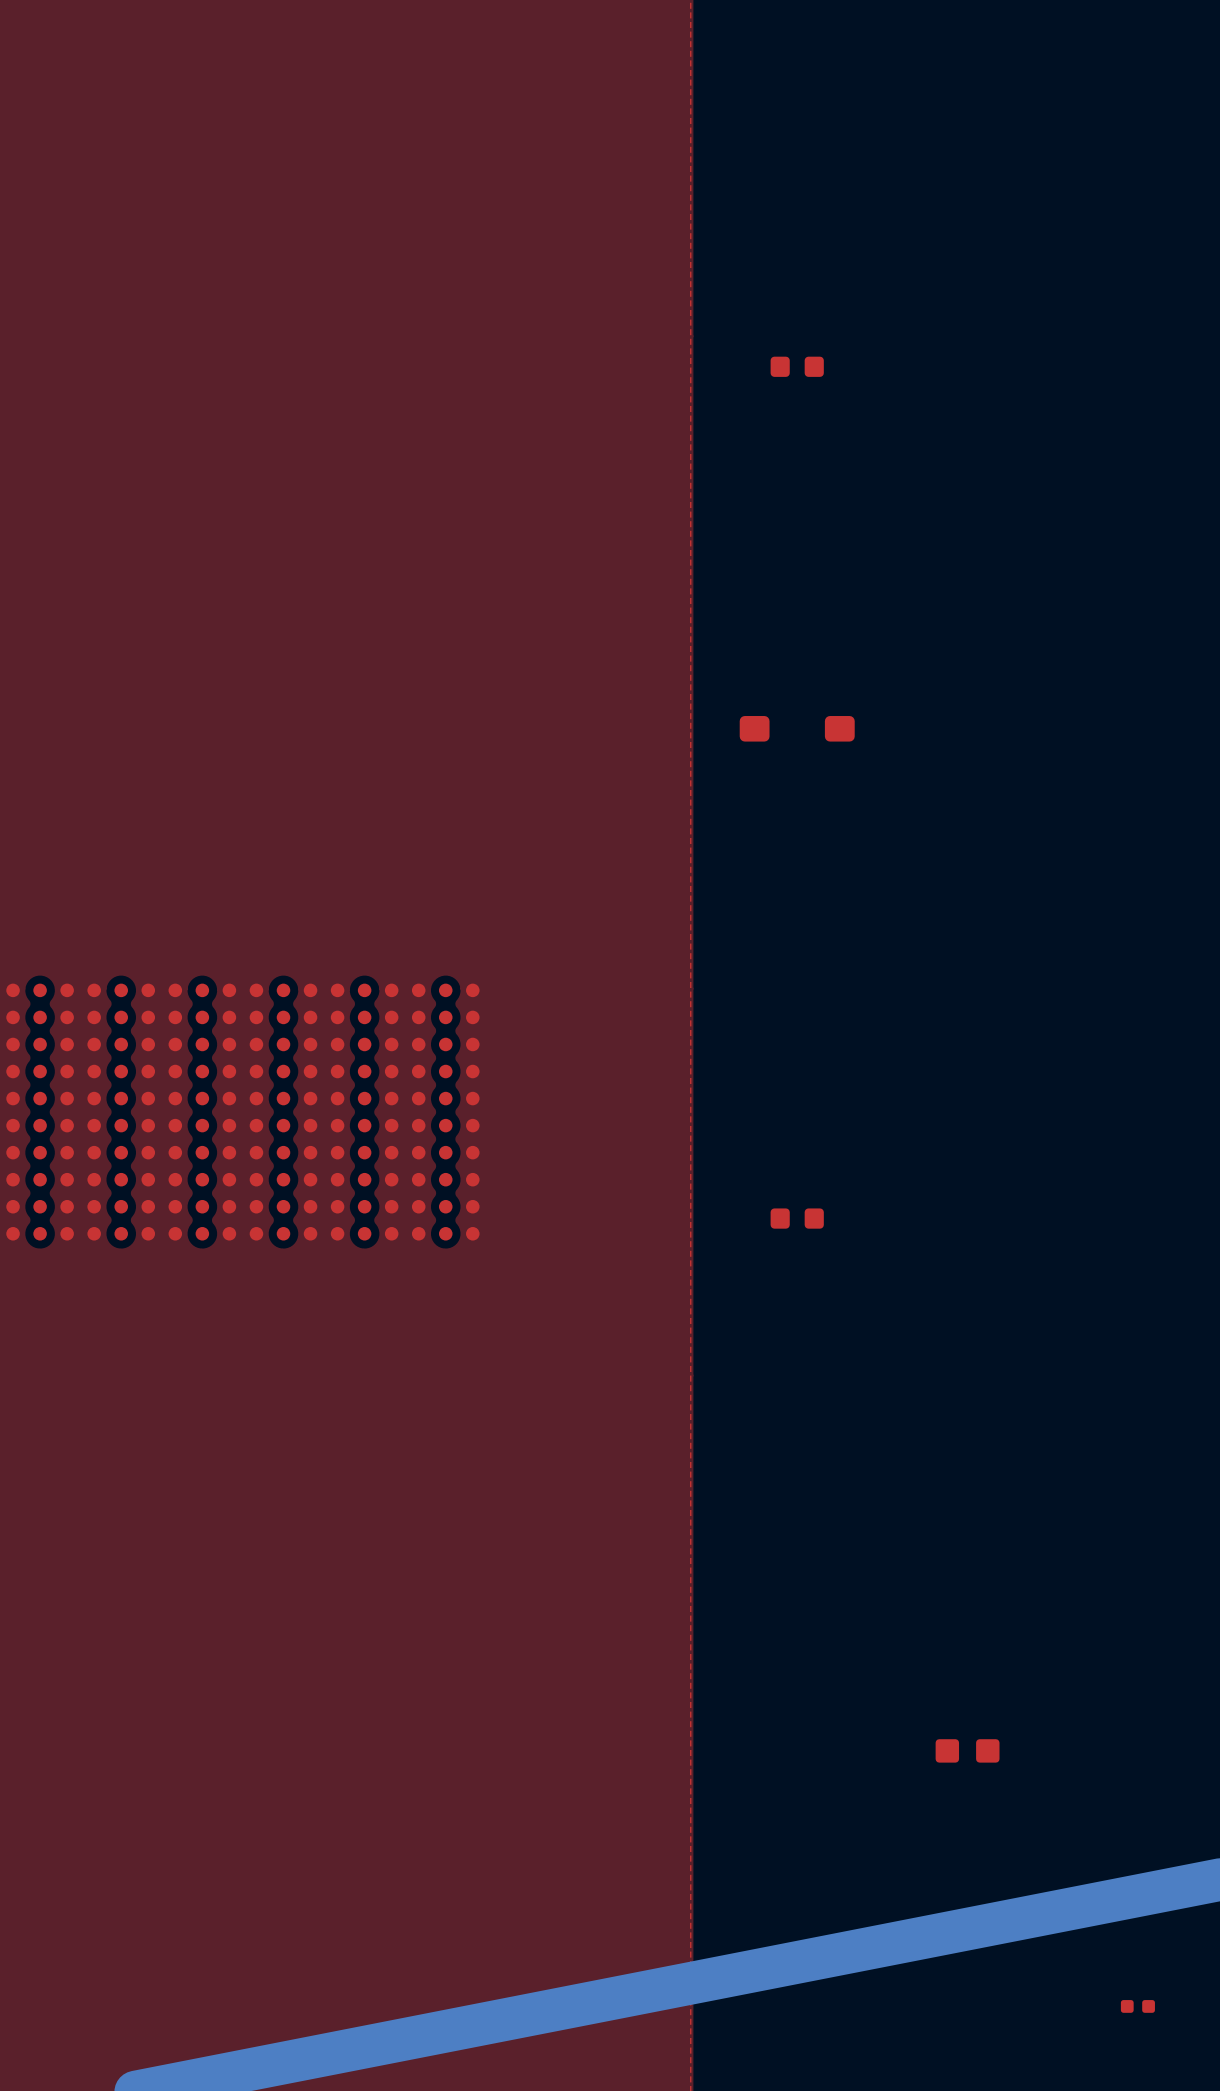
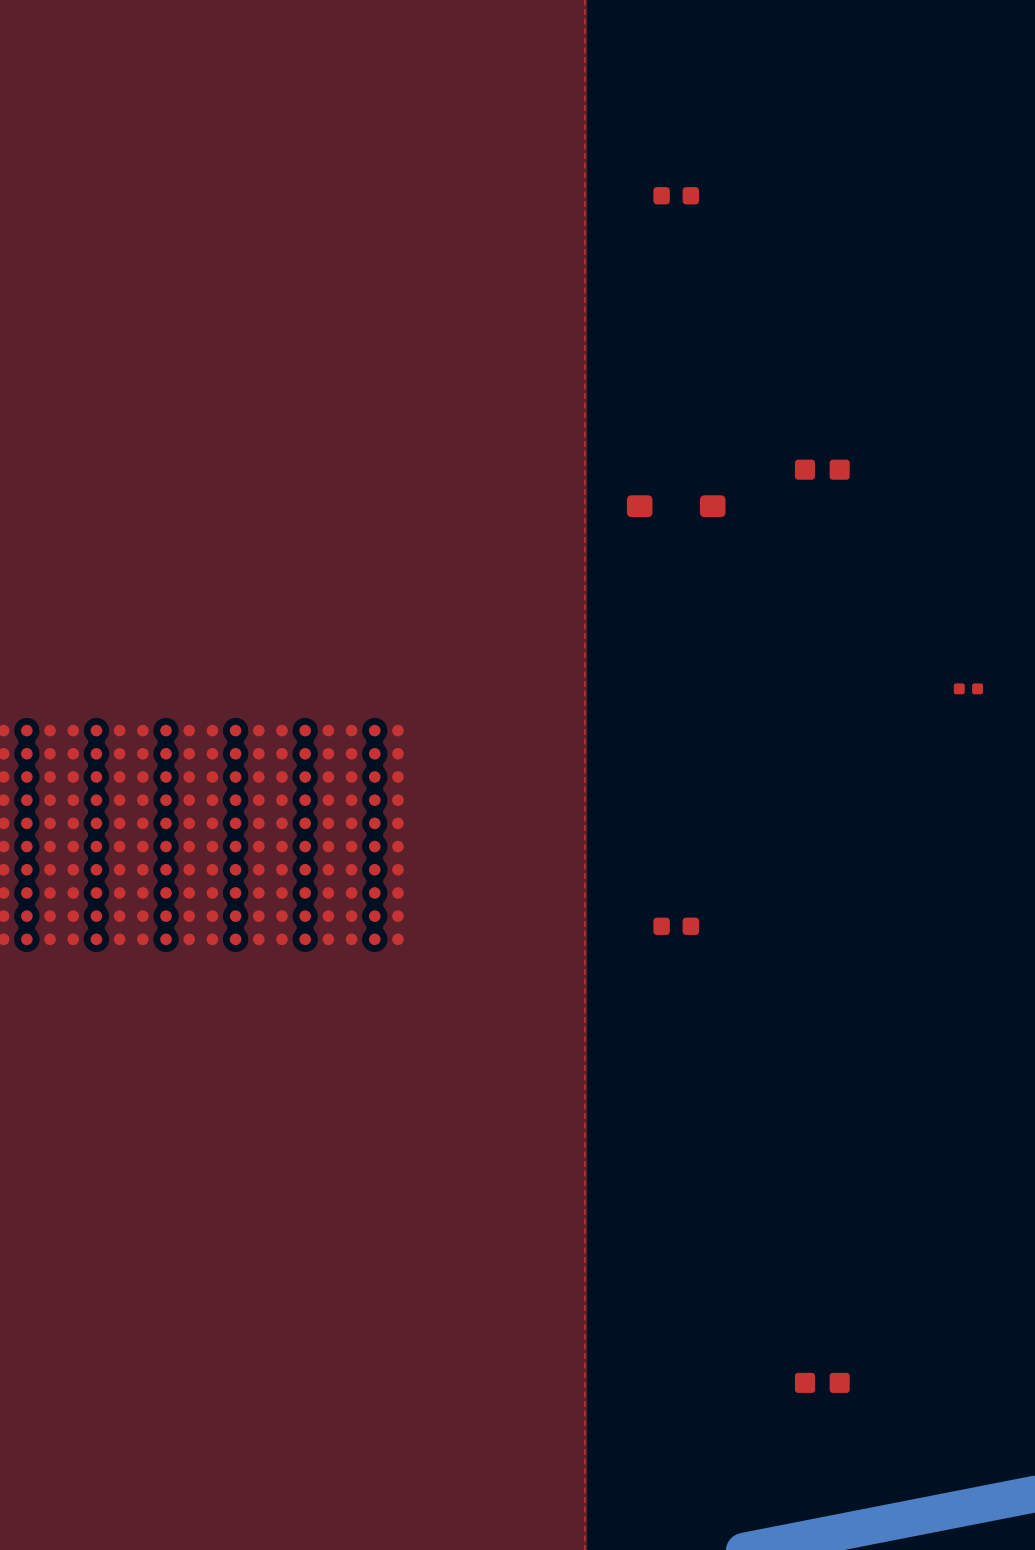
part: none -> (822, 469)
part: none -> (968, 688)

